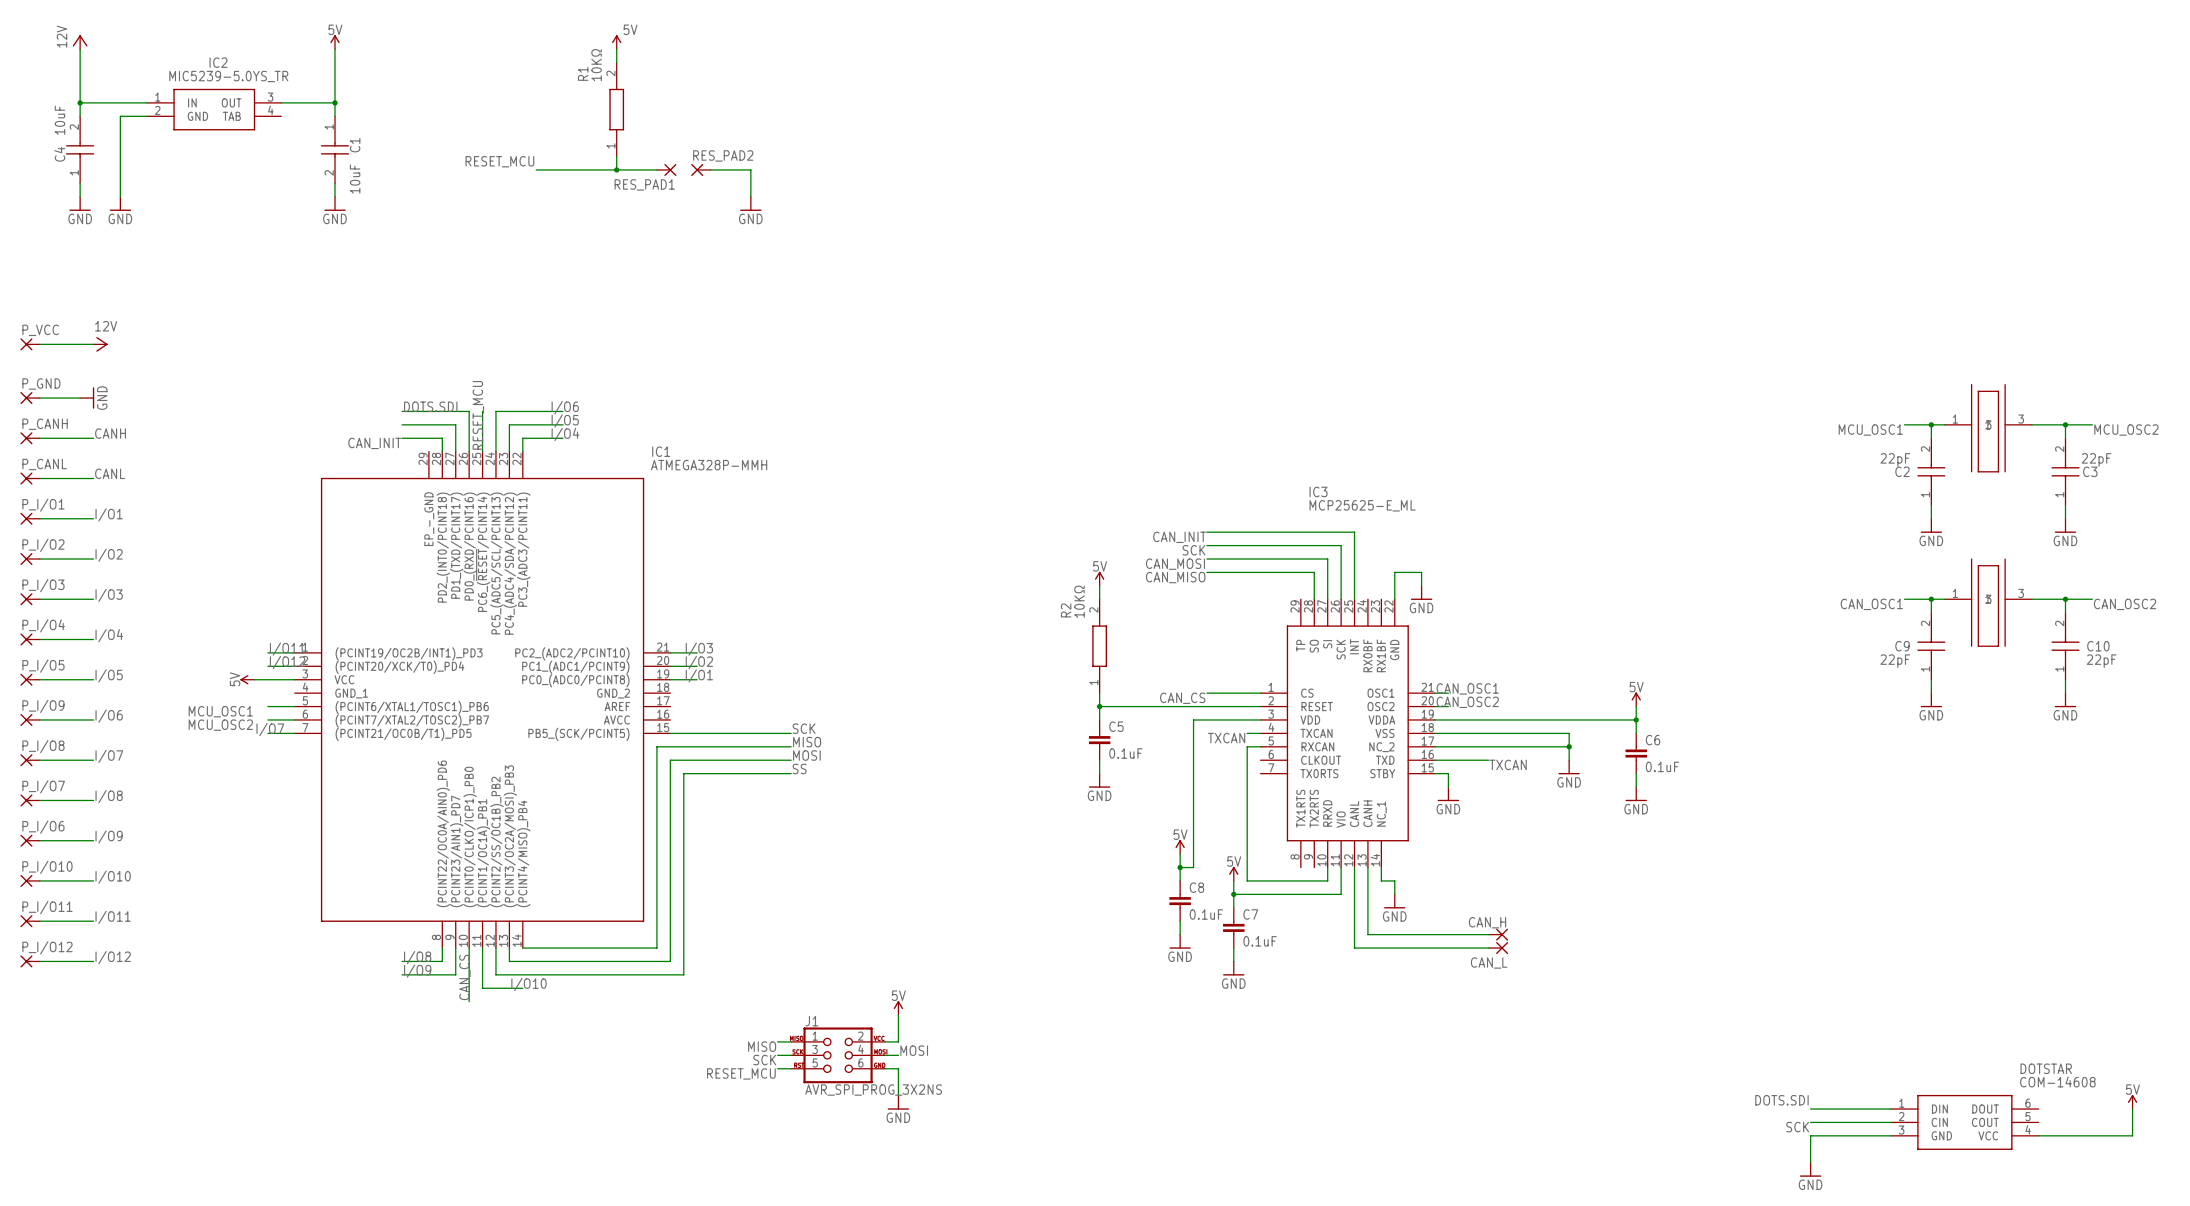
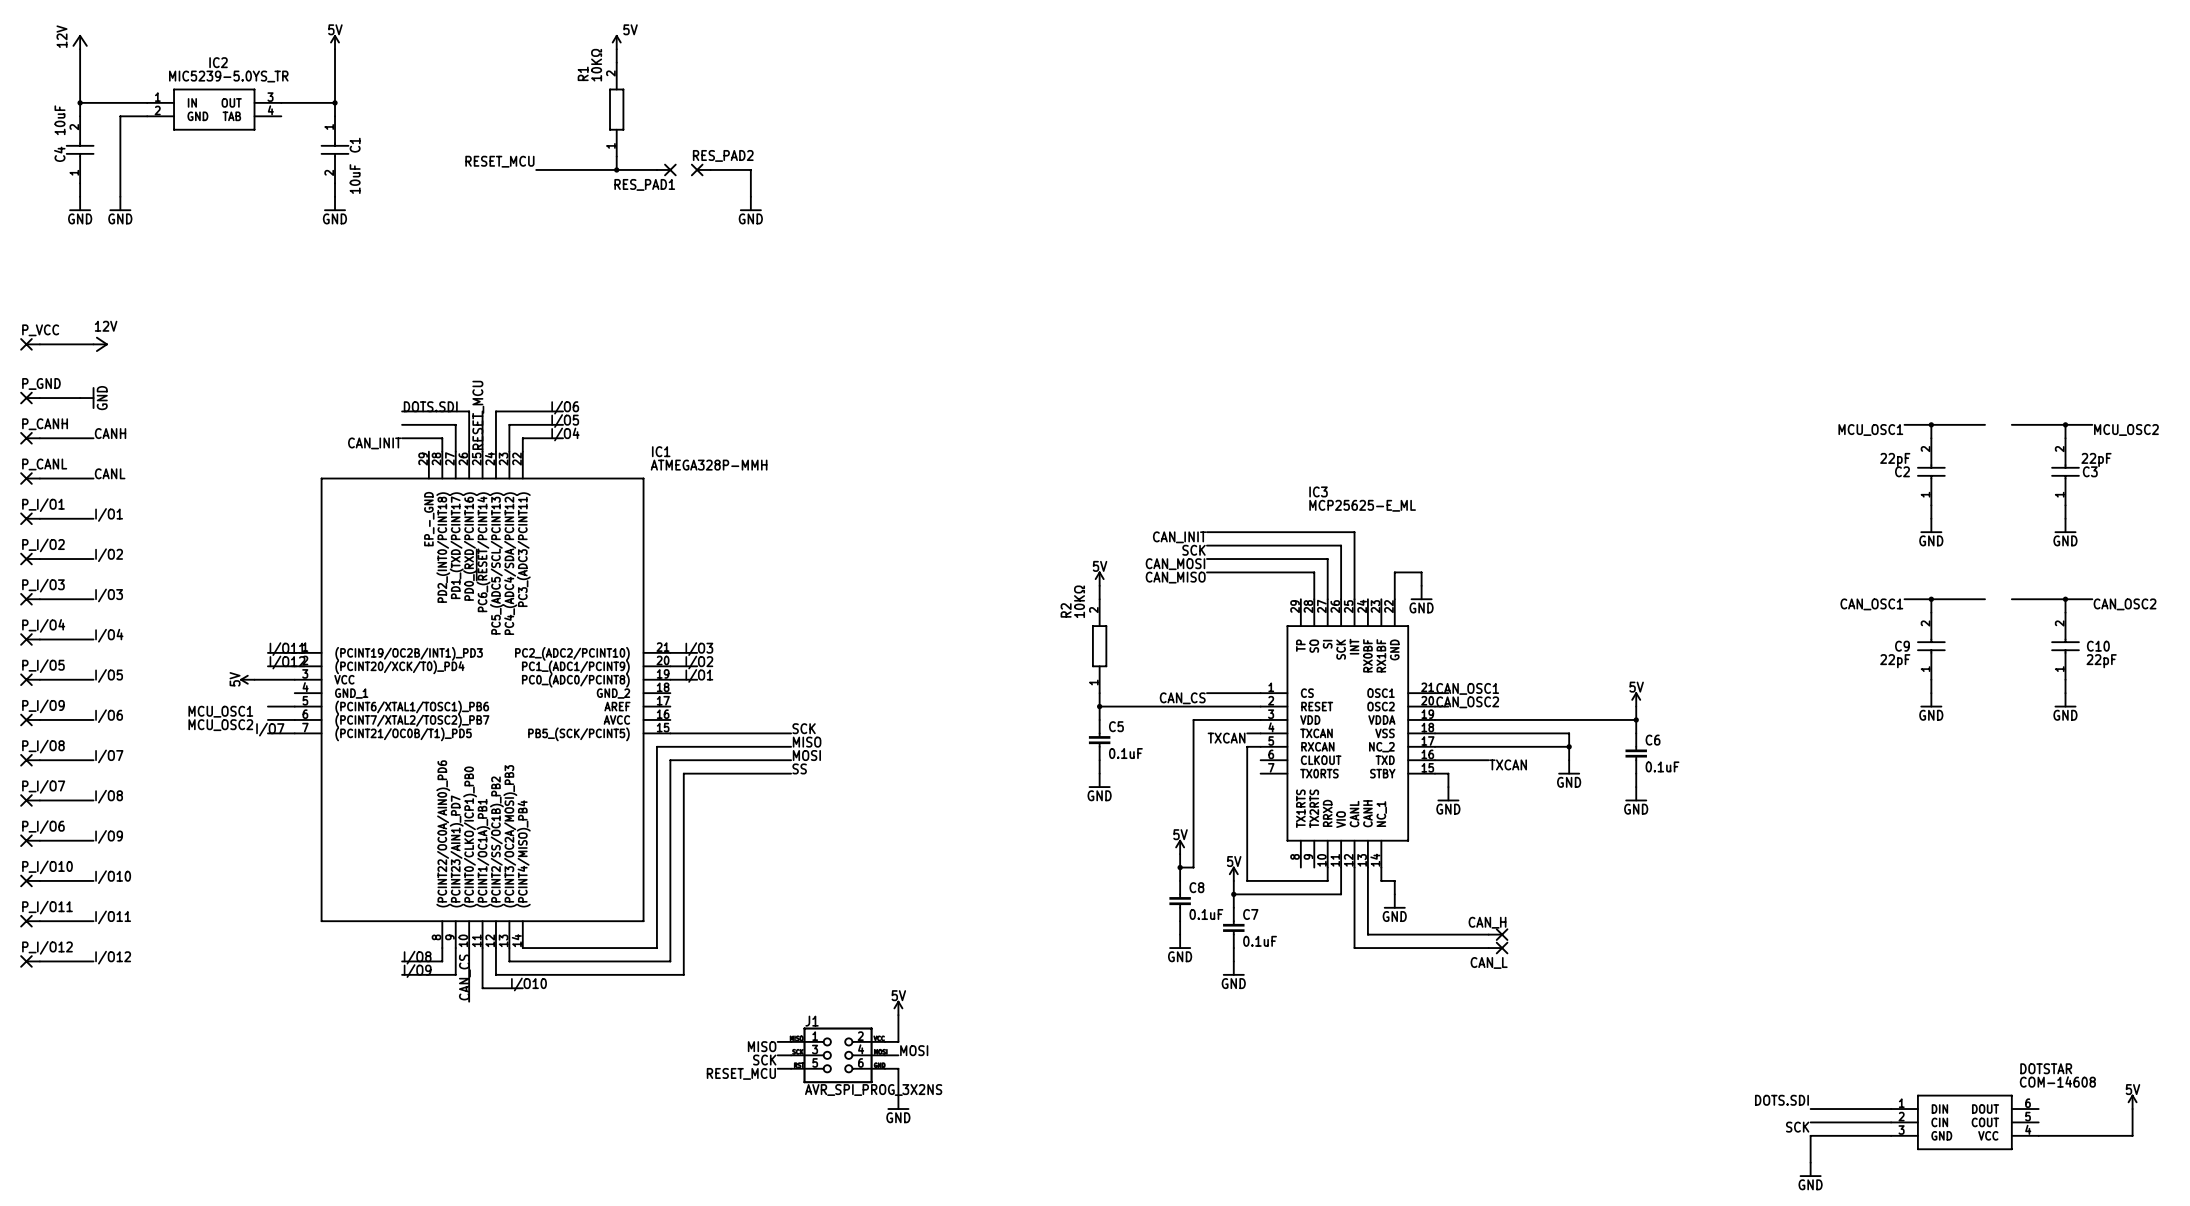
part: (1988, 428) -> none
part: (1988, 602) -> none

